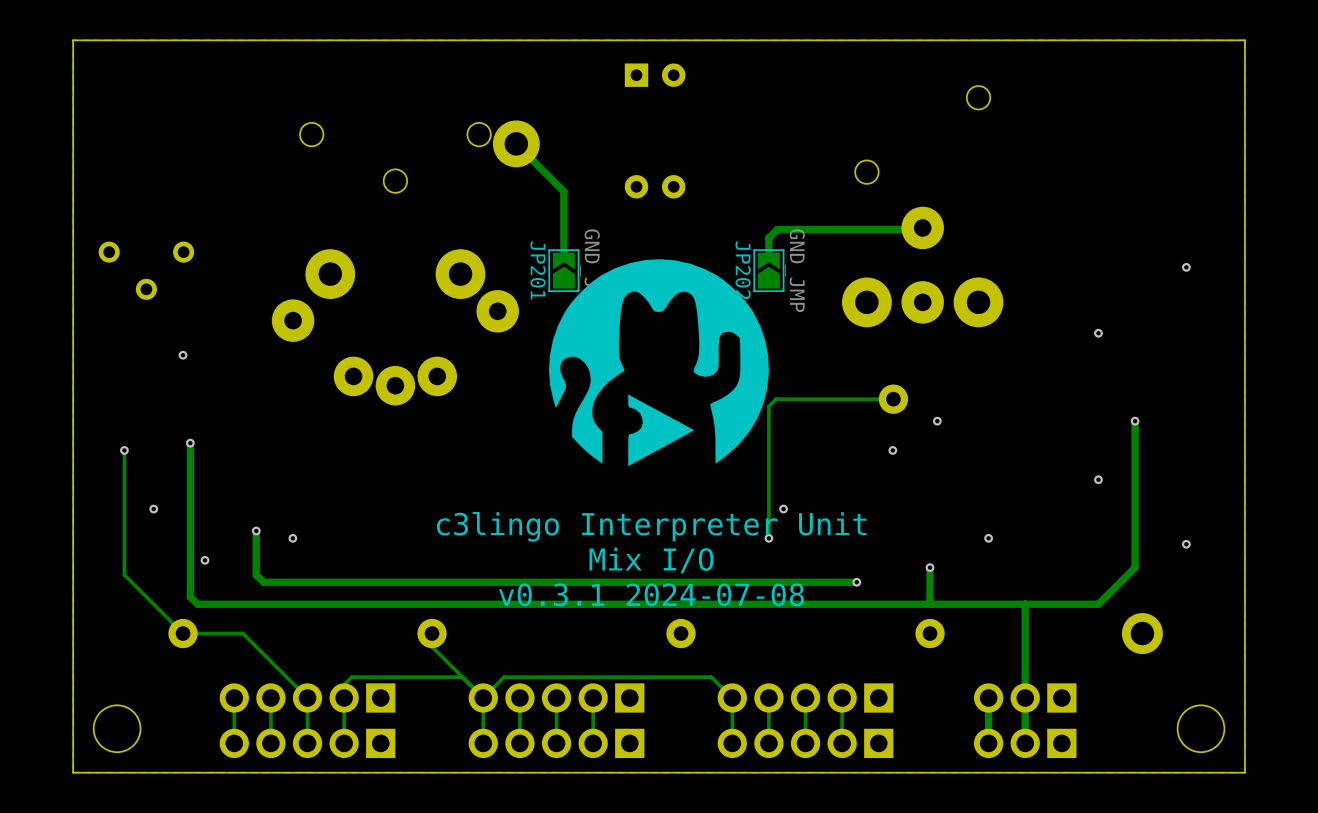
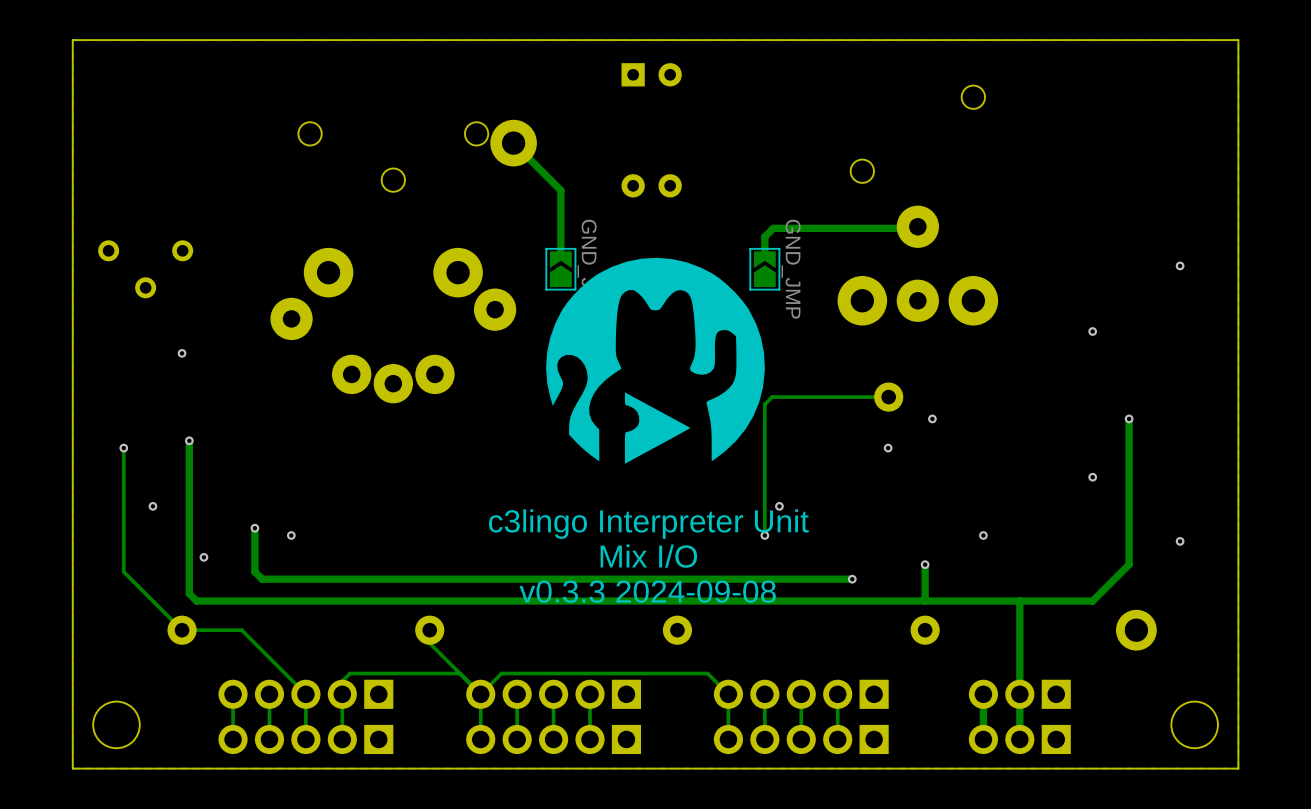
JP201 name: JP201 (538, 270) -> none
JP202 name: JP202 (743, 270) -> none
text: v0.3.1 2024-07-08 (651, 594) -> v0.3.3 2024-09-08 (647, 591)

